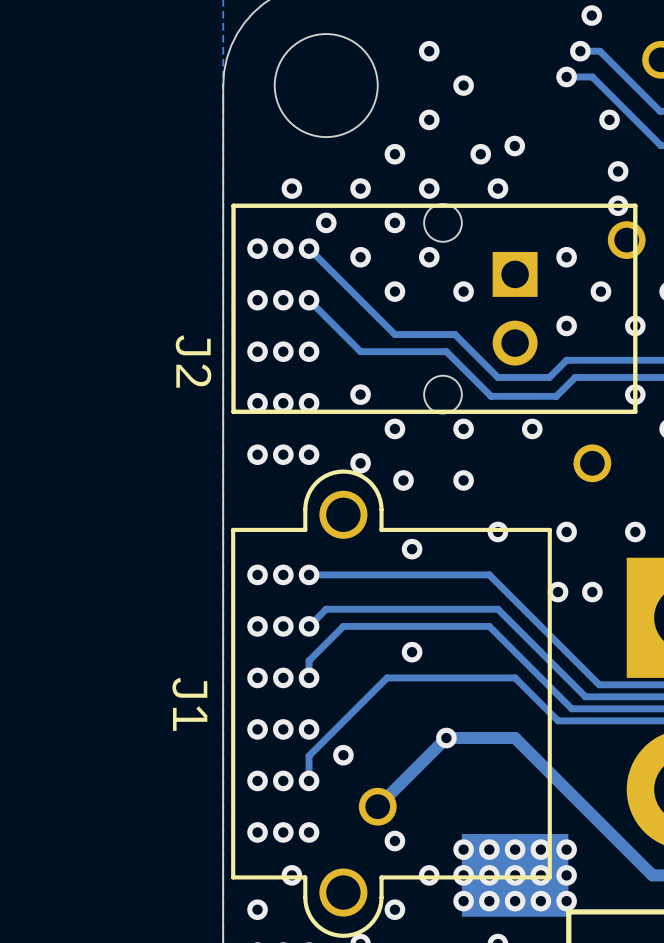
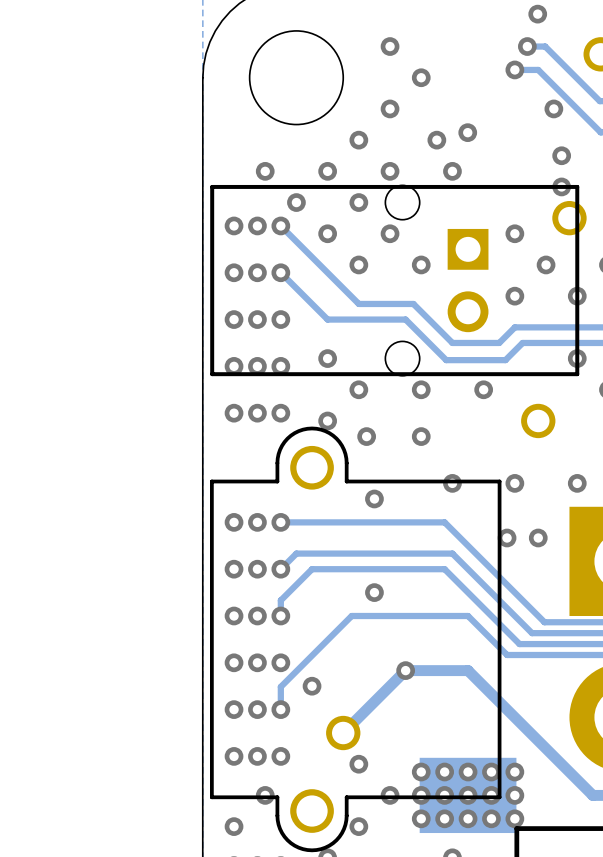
J2 name: J2 (193, 361) -> none
J1 name: J1 (189, 704) -> none

